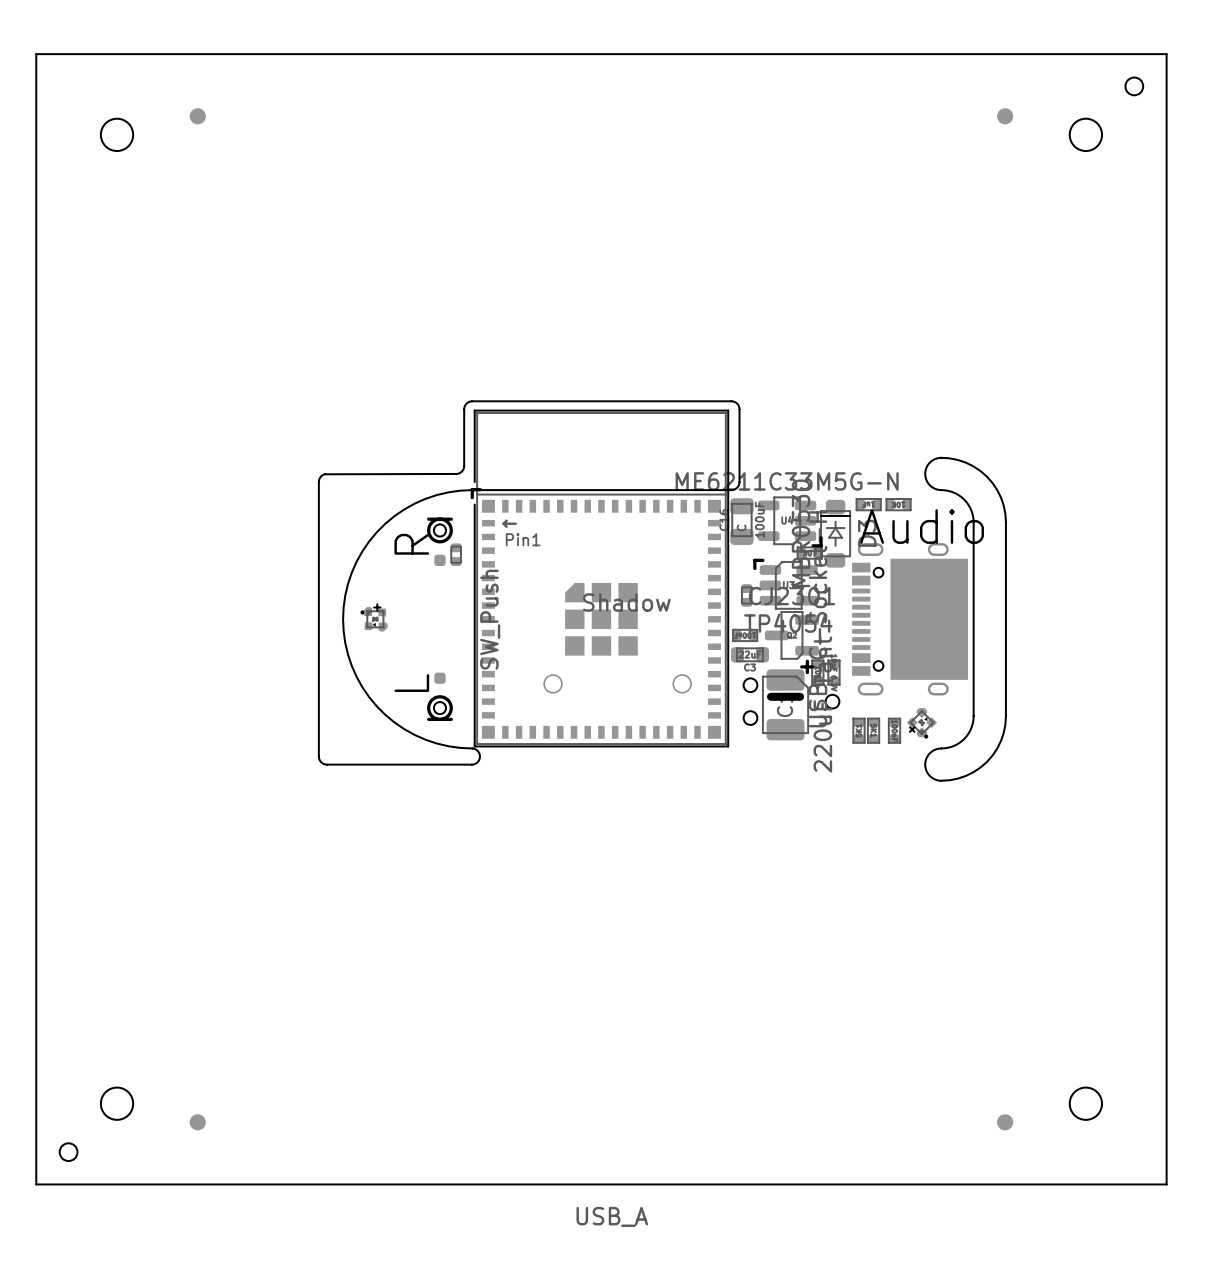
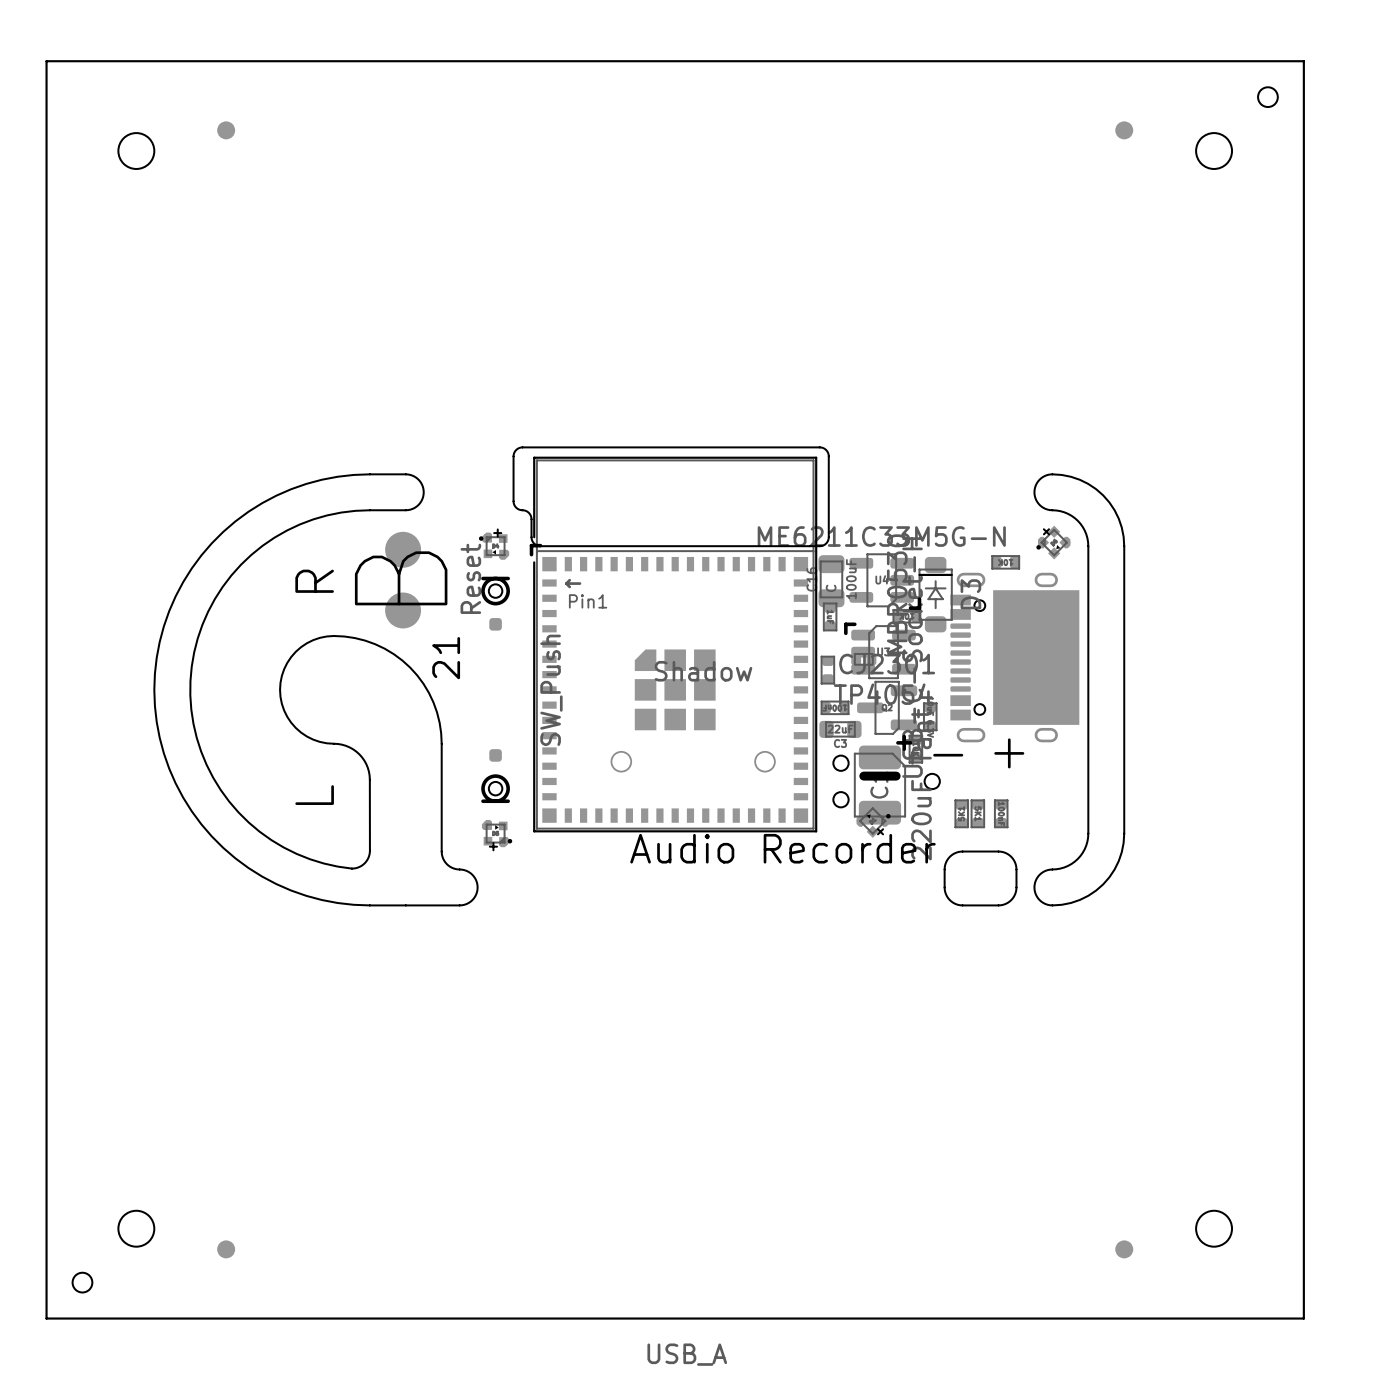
board edge: (472, 401) (467, 402) (464, 408) (464, 465) (460, 472) (324, 474) (319, 479) (318, 756) (322, 763) (471, 764) (478, 760) (479, 753) (475, 749) (448, 746) (425, 739) (404, 729) (376, 706) (362, 687) (351, 665) (345, 643) (343, 619) (348, 583) (356, 561) (369, 541) (385, 523) (404, 509) (425, 498) (448, 492) (480, 490) -> (531, 447) (519, 448) (513, 454) (513, 502) (517, 508) (525, 510) (530, 514) (531, 539) (535, 544) (540, 546)
board edge: none -> (369, 474) (405, 474) (414, 476) (423, 487) (421, 501) (416, 506) (408, 510) (355, 510) (313, 519) (274, 537) (240, 564) (214, 599) (197, 638) (190, 680) (193, 723) (201, 751) (213, 777) (229, 801) (248, 822) (271, 840) (296, 853) (323, 863) (351, 868) (357, 867) (366, 861) (369, 852) (369, 779) (366, 764) (359, 754) (349, 747) (313, 739) (295, 727) (284, 710) (280, 696) (280, 682) (284, 669) (295, 651) (306, 643) (319, 637) (333, 635) (354, 638) (375, 644) (393, 654) (417, 675) (428, 692) (437, 712) (441, 743) (442, 855) (450, 866) (470, 873) (477, 885) (473, 898) (464, 904) (369, 905) (337, 903) (291, 890) (262, 876) (223, 847) (201, 824) (175, 783) (159, 737) (154, 689) (159, 641) (175, 596) (201, 555) (235, 521) (276, 495) (321, 479) (369, 474)
board edge: (941, 457) (933, 459) (927, 465) (925, 473) (927, 482) (935, 488) (952, 491) (961, 497) (970, 508) (973, 522) (973, 719) (968, 733) (961, 741) (952, 746) (935, 749) (927, 756) (925, 764) (927, 772) (933, 778) (941, 780) (966, 775) (987, 761) (1001, 740) (1005, 716) (1005, 522) (1003, 505) (997, 490) (980, 471) (966, 462) (941, 457) -> (1052, 474) (1043, 476) (1036, 483) (1034, 492) (1036, 501) (1045, 508) (1064, 512) (1074, 518) (1084, 530) (1088, 546) (1088, 837) (1084, 849) (1074, 861) (1064, 867) (1045, 870) (1036, 878) (1034, 887) (1036, 896) (1043, 903) (1052, 905) (1079, 899) (1103, 884) (1118, 861) (1124, 833) (1124, 546) (1121, 527) (1109, 502) (1096, 489) (1070, 476) (1052, 474)
part: none -> (1053, 542)
part: none -> (494, 544)
part rotation: 0° (868, 504) -> 90° clockwise (830, 616)
part position: (868, 504) -> (830, 616)
part: none -> Reset (403, 580)
text: Audio (922, 526) -> none
text position: R (411, 544) -> R (314, 581)
part rotation: 0° (456, 554) -> 90° clockwise (863, 659)
part position: (456, 554) -> (863, 659)
part footprint: [741, 584, 753, 607] -> [820, 655, 836, 685]
text: none -> 21 (446, 658)
part rotation: 0° (374, 617) -> 180° (497, 835)
part position: (374, 617) -> (497, 835)
part position: (910, 619) -> (1014, 657)
part position: (833, 672) -> (930, 716)
text: none -> + (1009, 753)
text: none -> - (948, 755)
text position: L (411, 683) -> L (314, 795)
part rotation: 0° (921, 723) -> 90° counterclockwise (873, 820)
part position: (921, 723) -> (873, 820)
text: none -> Audio Recorder (782, 848)
board edge: none -> (962, 851) (1000, 851) (1011, 856) (1016, 869) (1016, 891) (1011, 900) (1000, 905) (962, 905) (949, 900) (944, 889) (945, 865) (951, 855) (962, 851)

